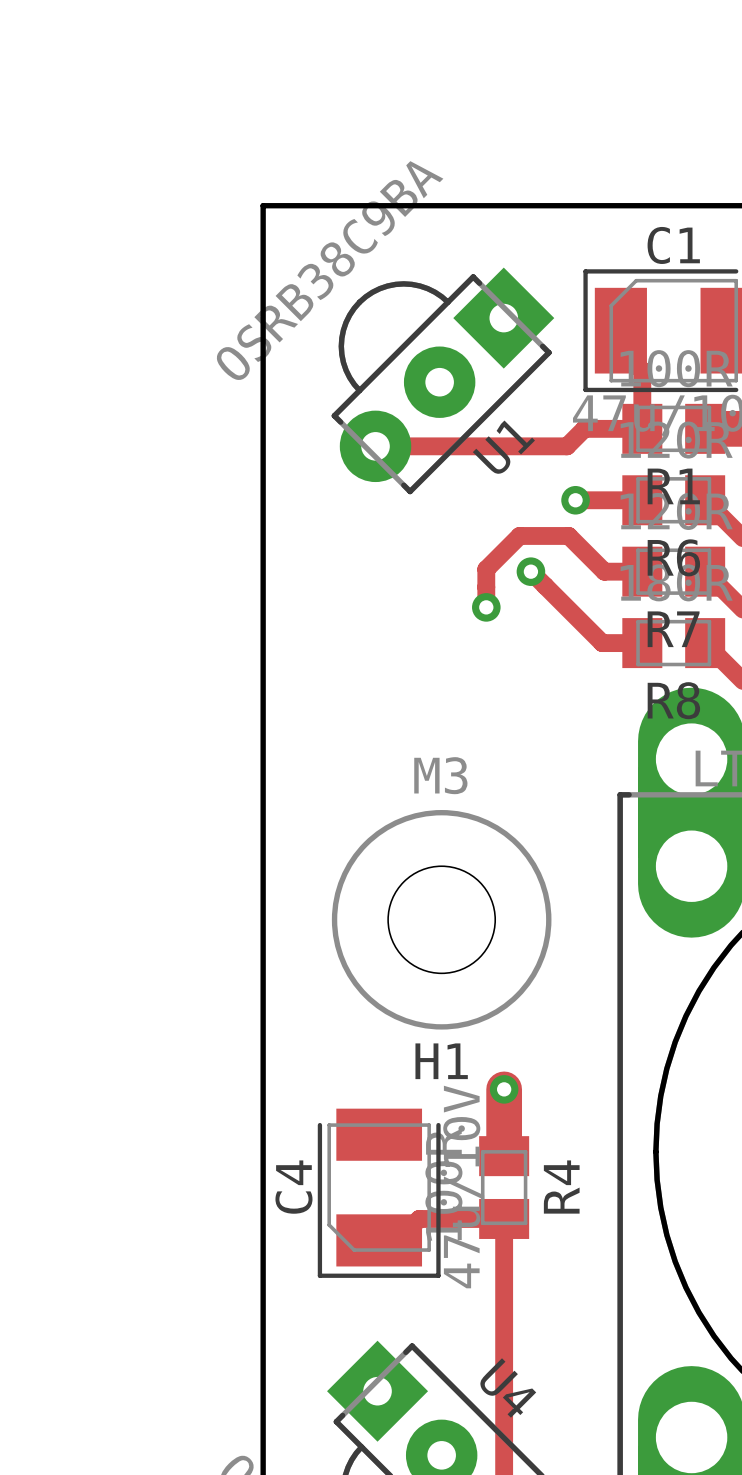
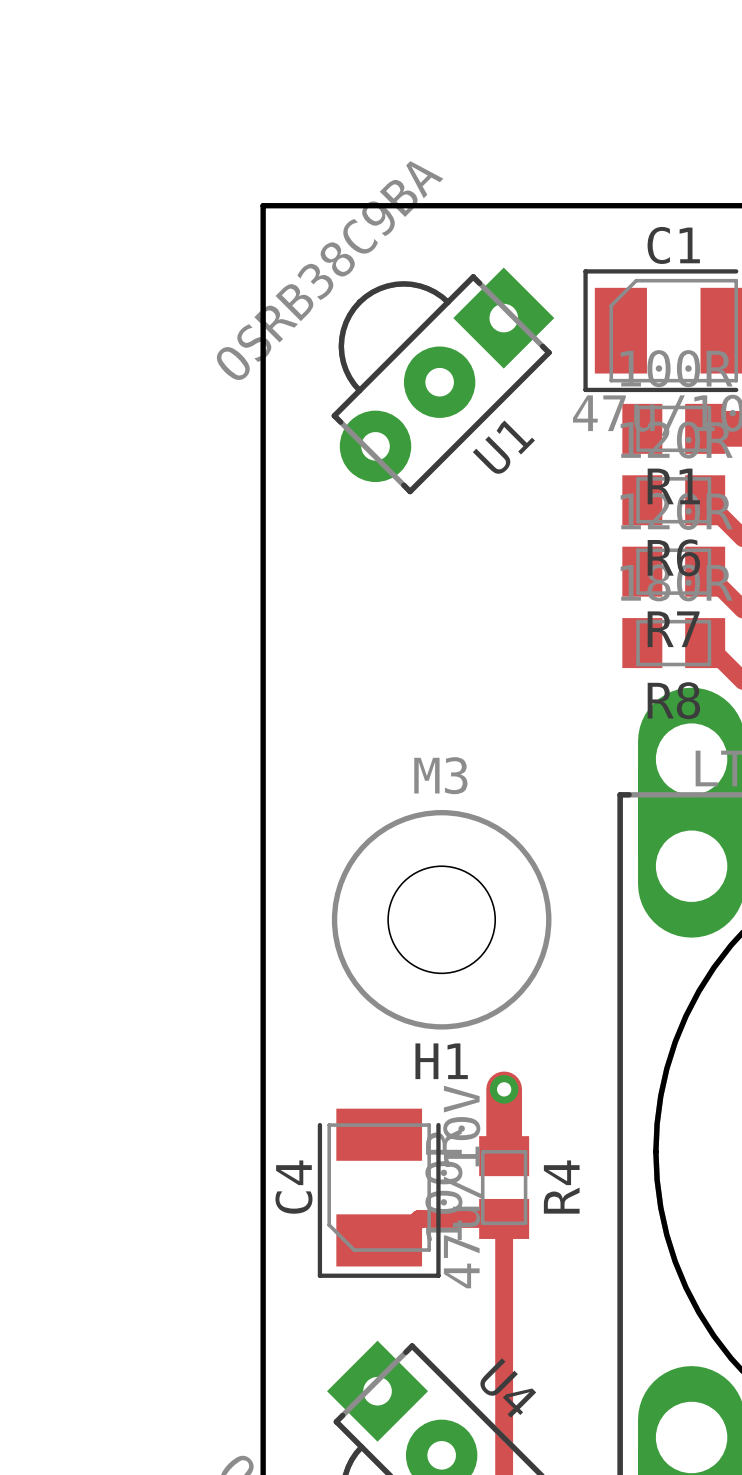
track: (620, 330) (629, 338) (629, 357) (642, 370) (642, 428) (584, 428) (567, 446) (375, 446) -> none
track: (575, 500) (642, 500) -> none
via: (575, 500) -> none
track: (530, 571) (602, 643) (642, 643) -> none
via: (530, 571) -> none
track: (642, 571) (604, 571) (568, 535) (519, 535) (486, 569) (486, 607) -> none
via: (486, 607) -> none

